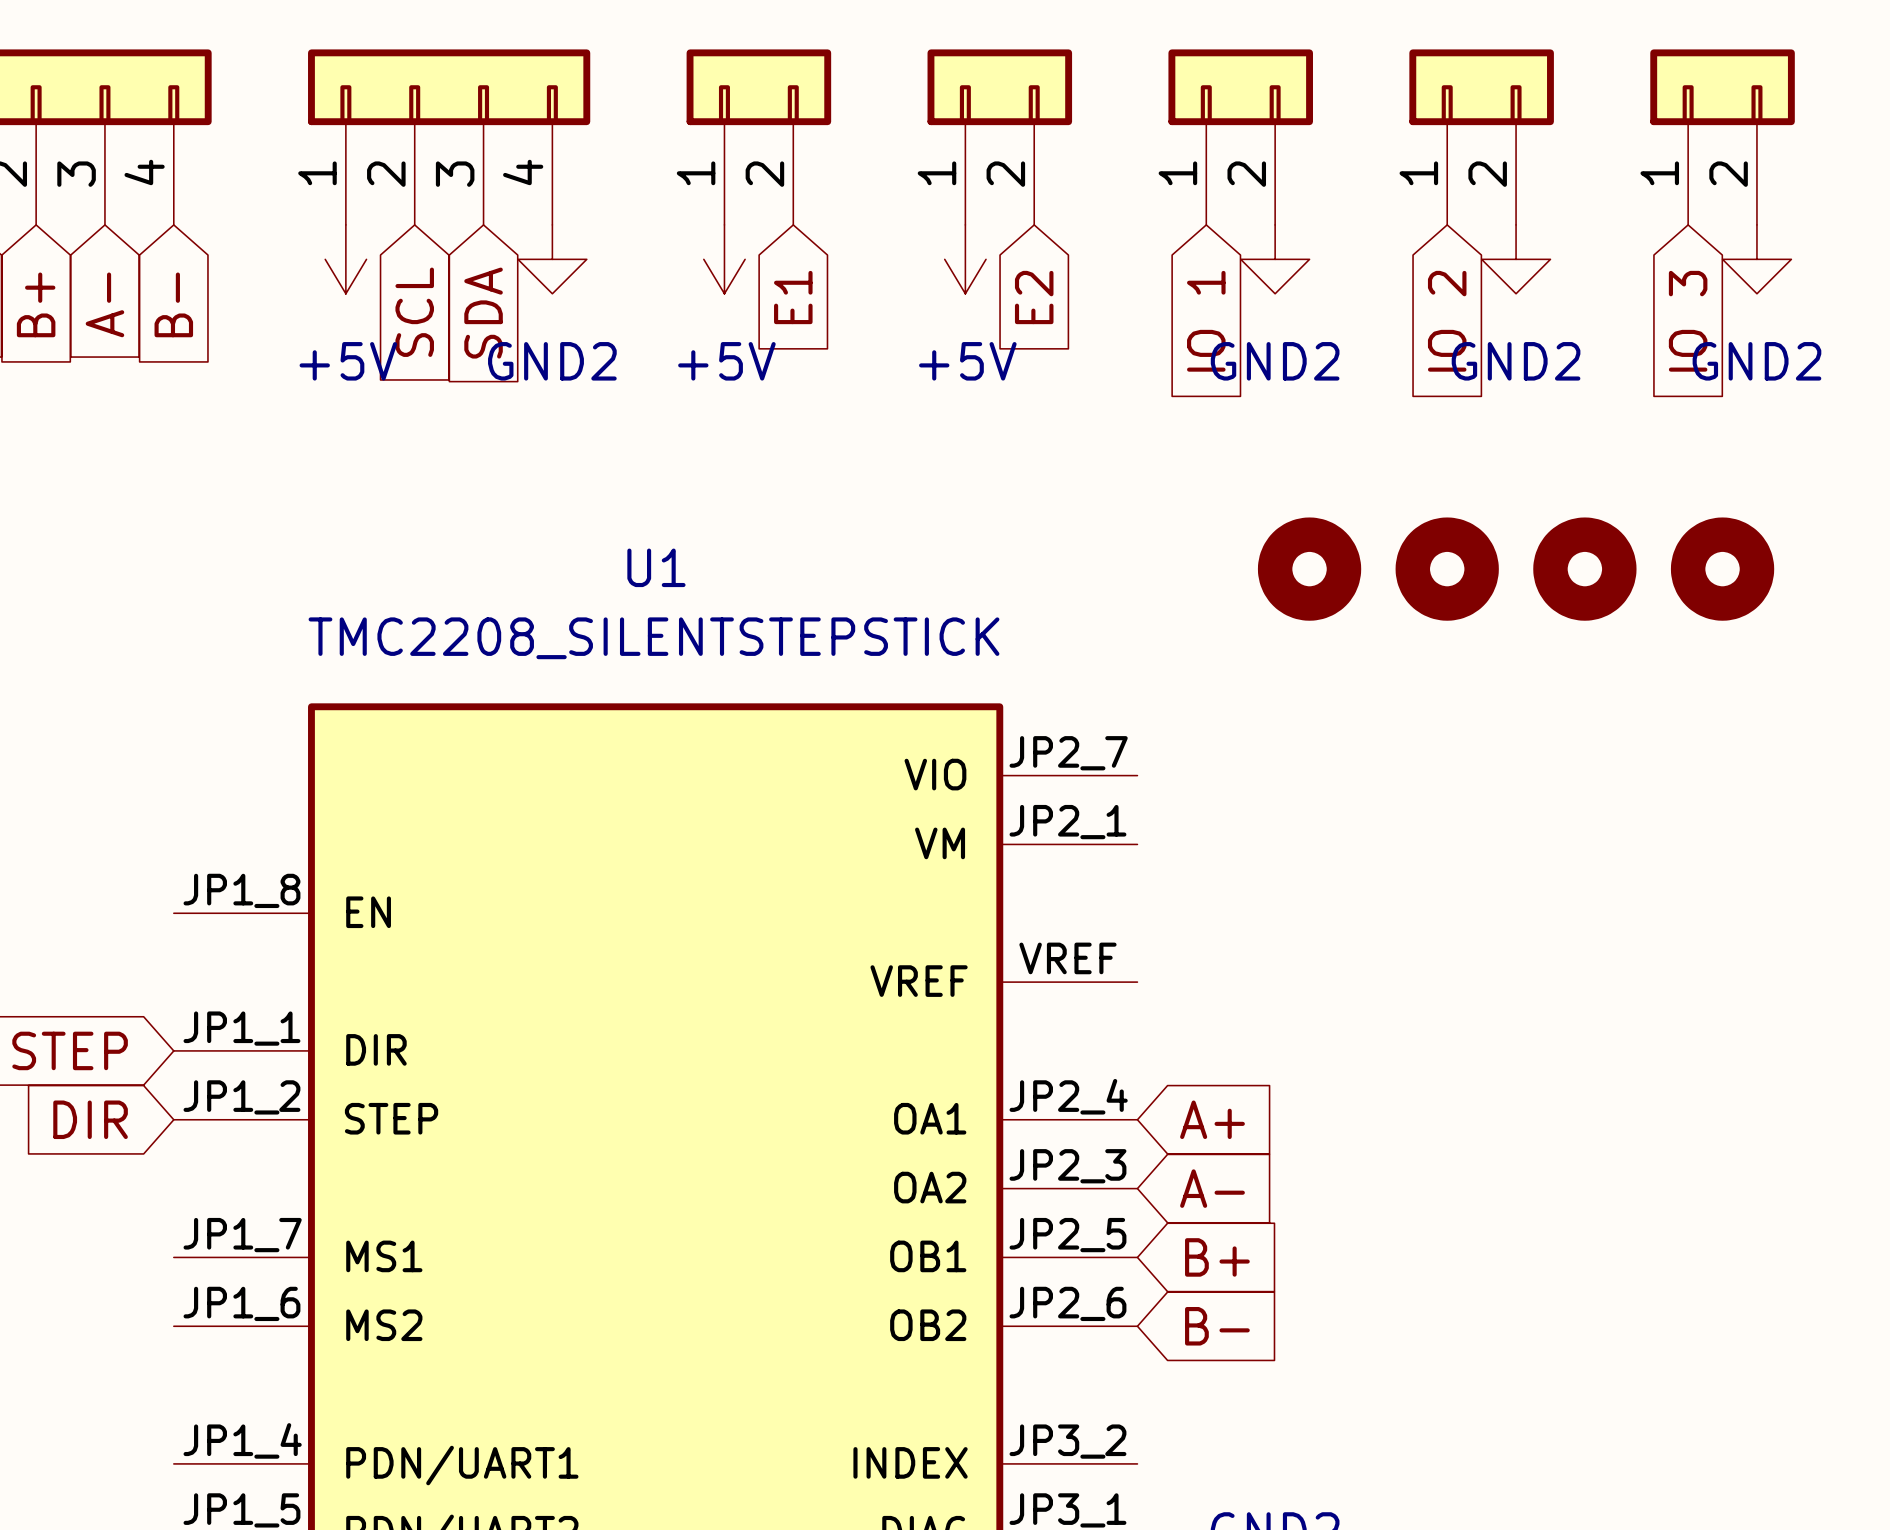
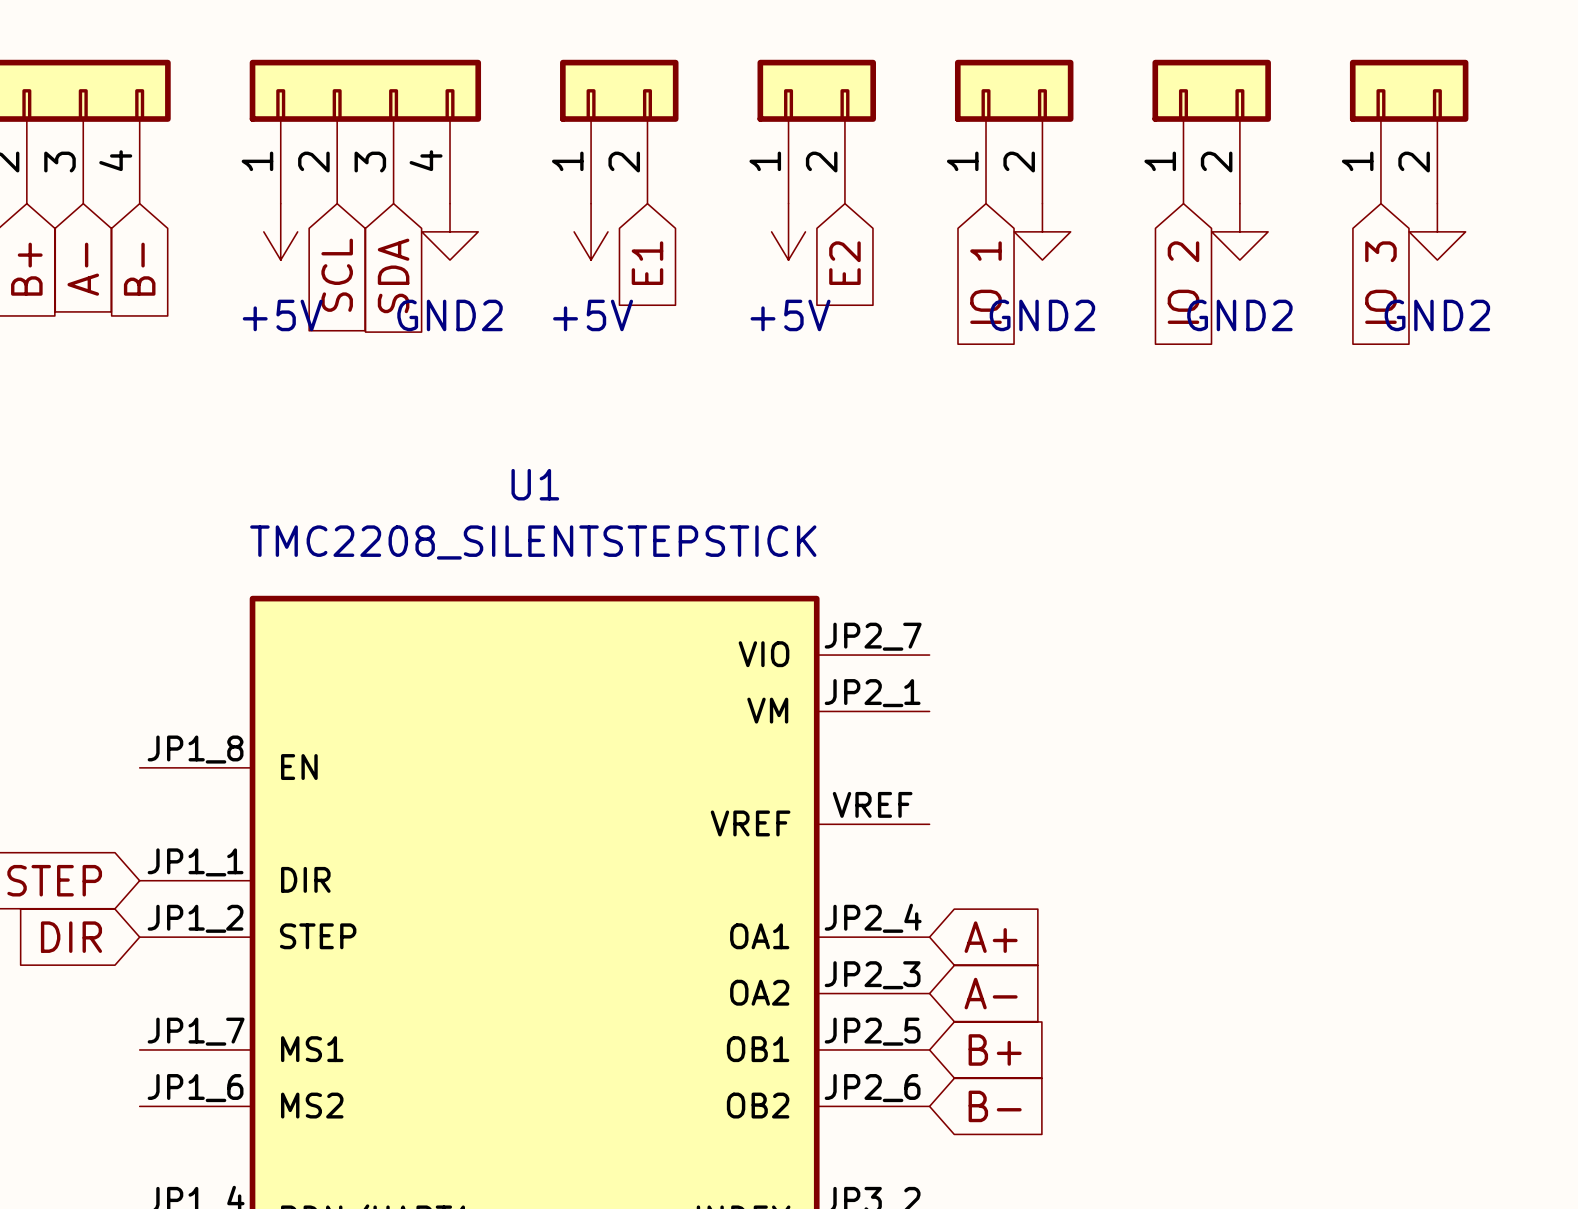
part: (1309, 569) -> none
part: (1447, 569) -> none
part: (1584, 569) -> none
part: (1722, 569) -> none

